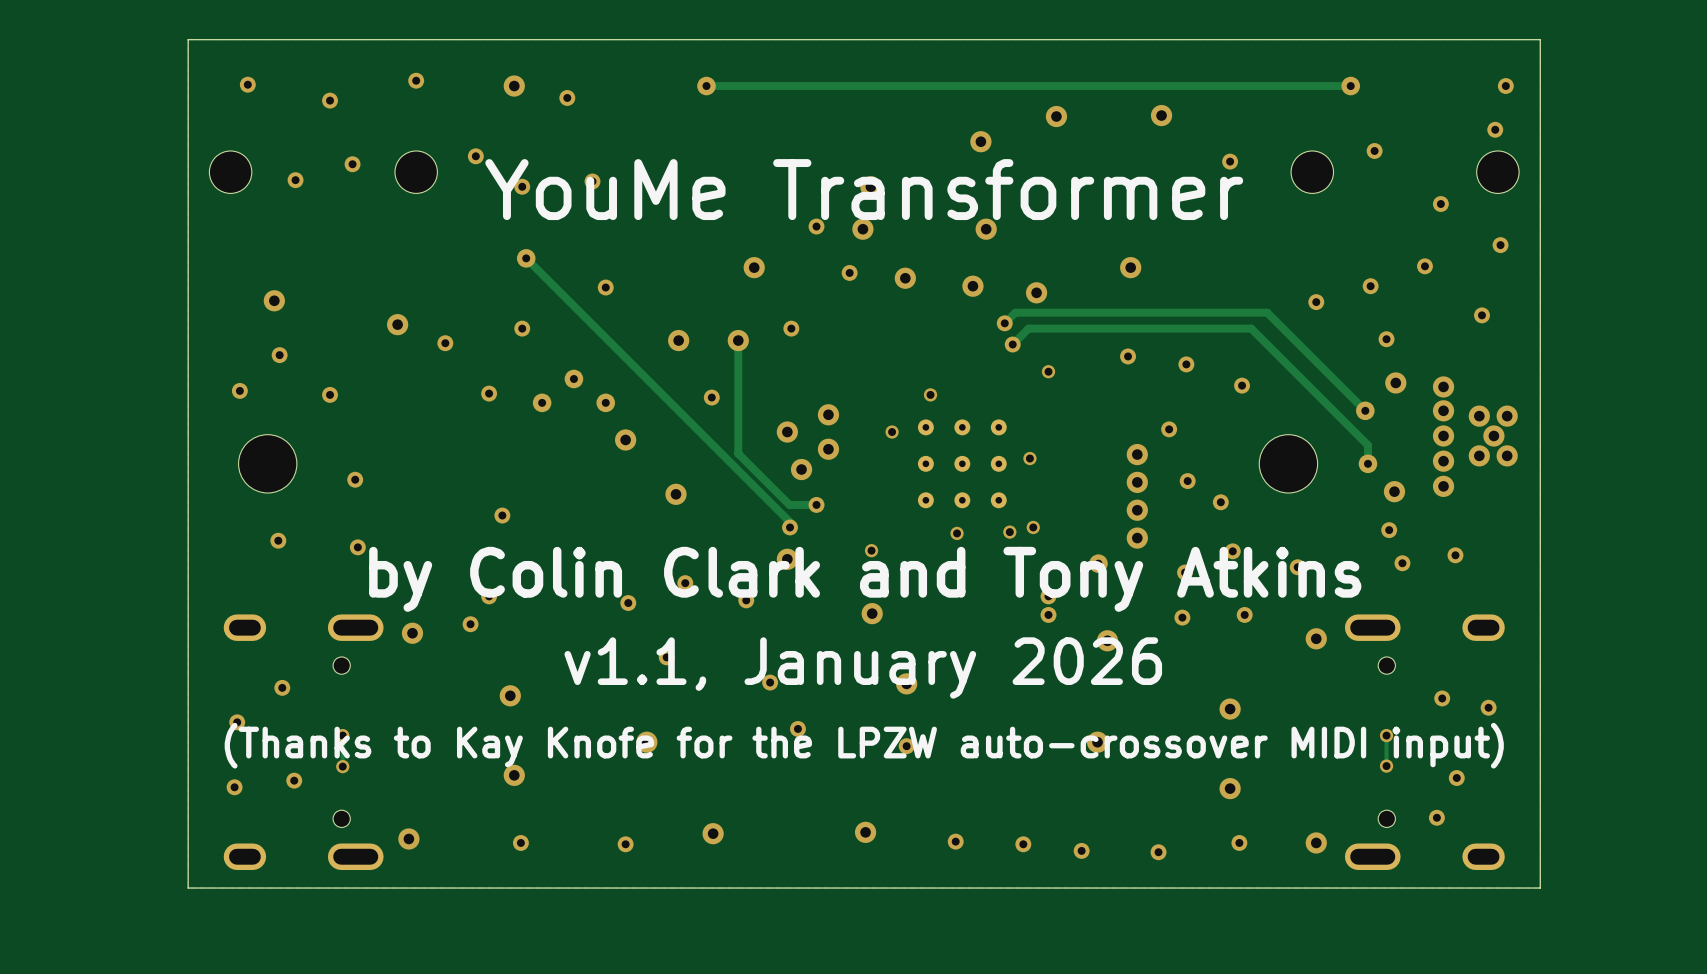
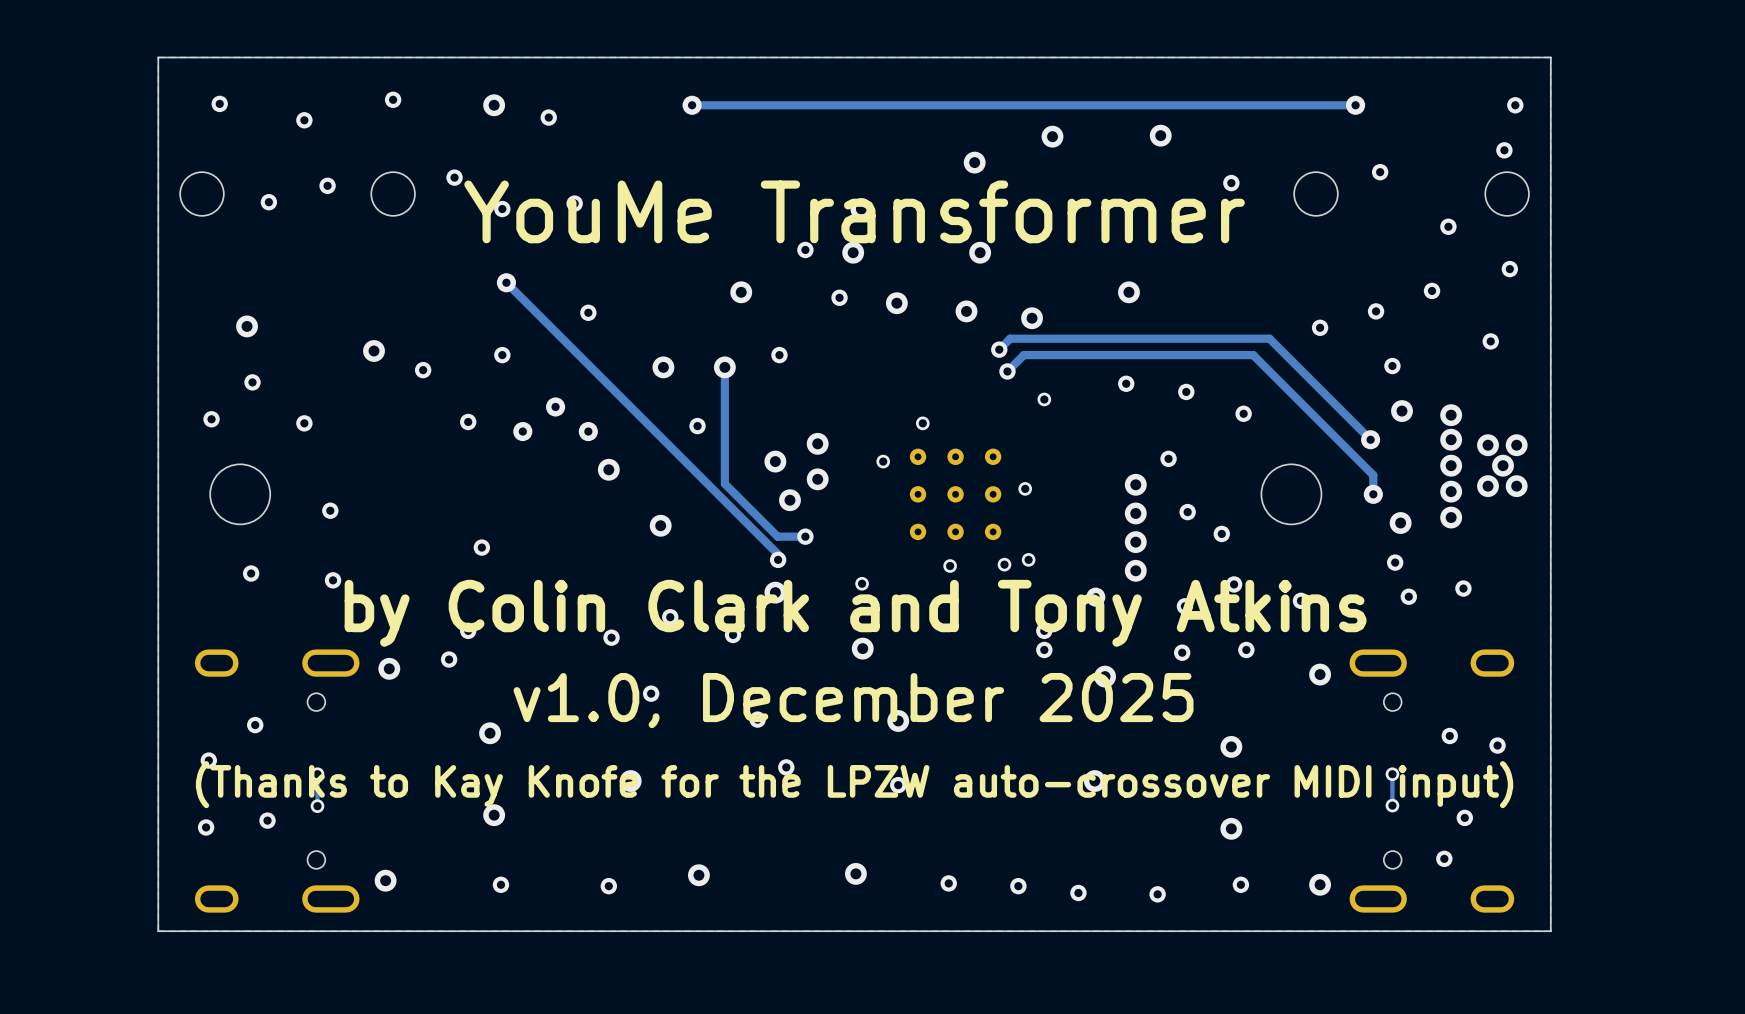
text: v1.1, January 2026 (863, 667) -> v1.0, December 2025 (853, 700)

